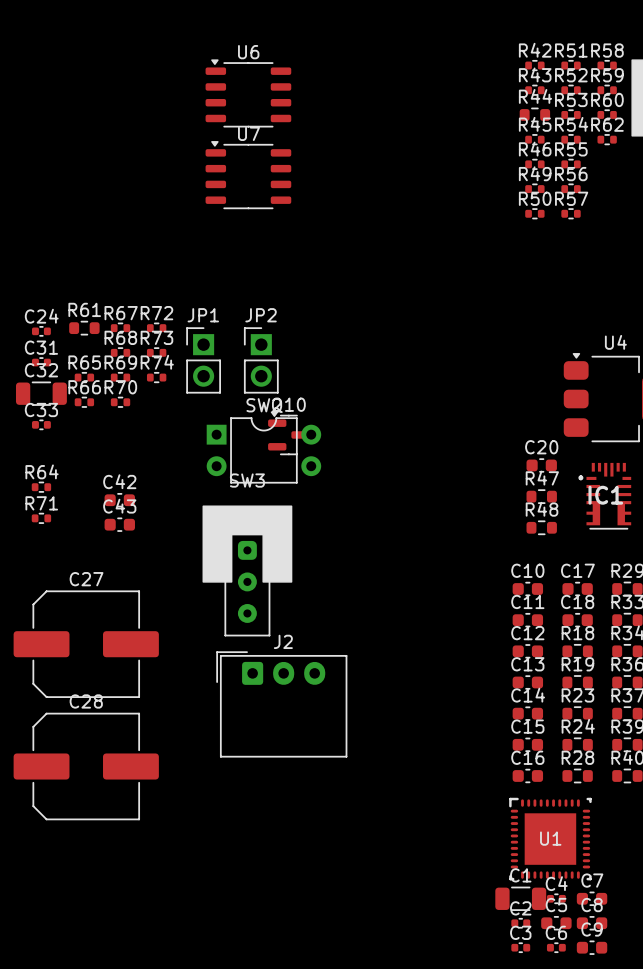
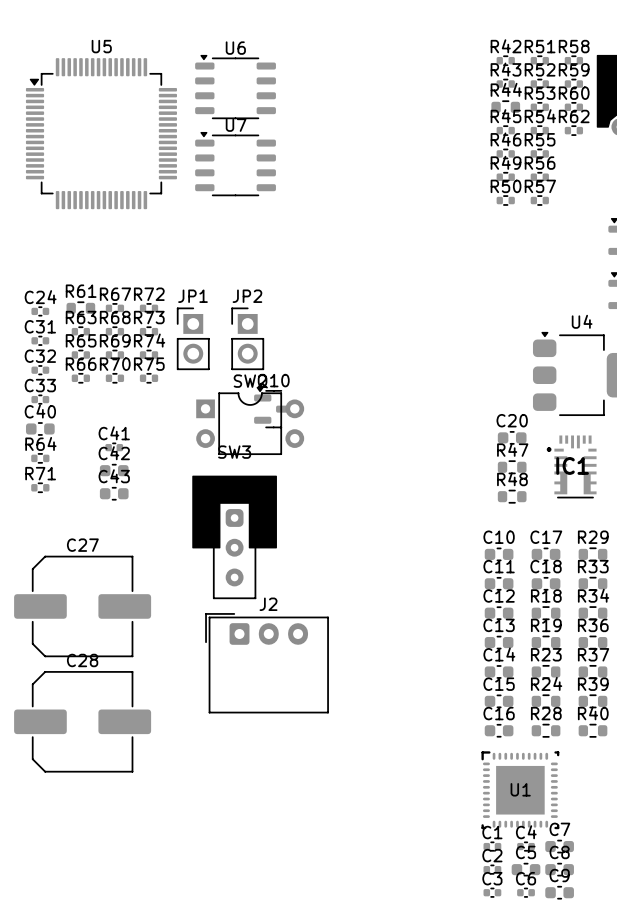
U5: none -> (101, 133)
R63: none -> (80, 331)
C32 footprint: [15, 381, 67, 406] -> [31, 365, 50, 376]
R75: none -> (149, 378)
C40: none -> (40, 428)
C41: none -> (114, 447)
C1 footprint: [495, 886, 547, 911] -> [483, 841, 502, 852]

